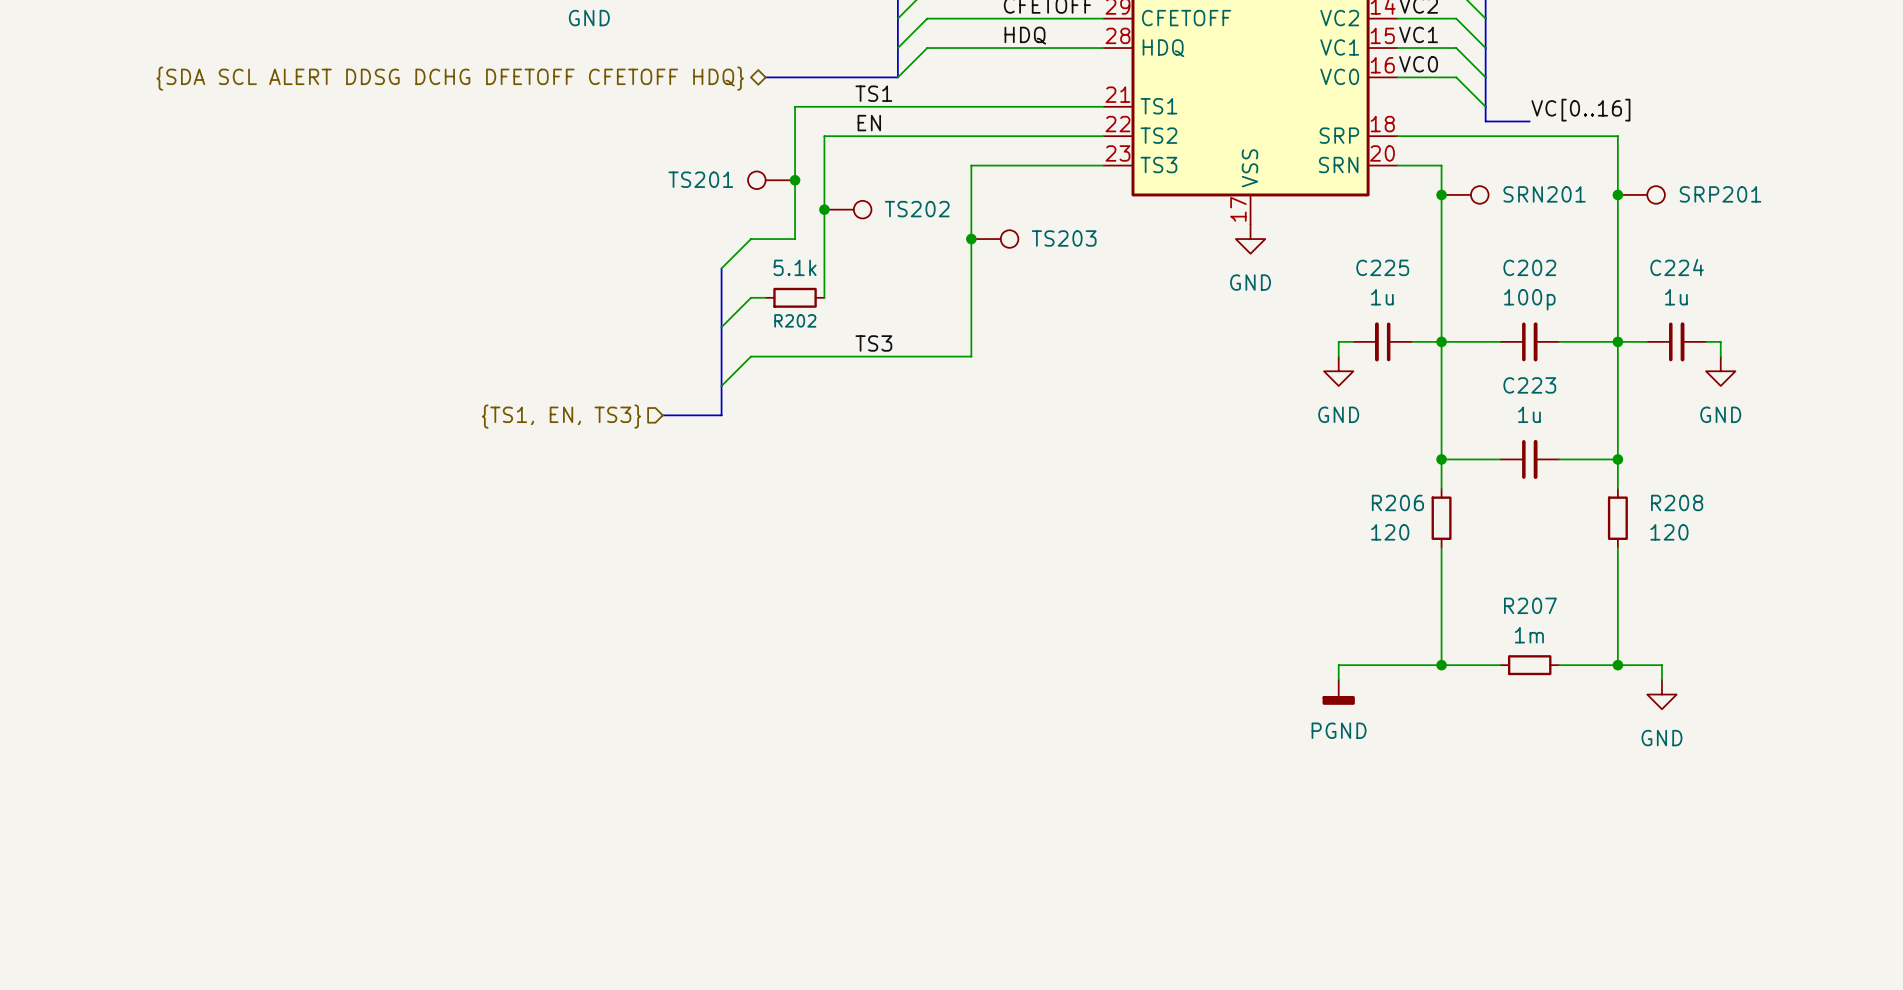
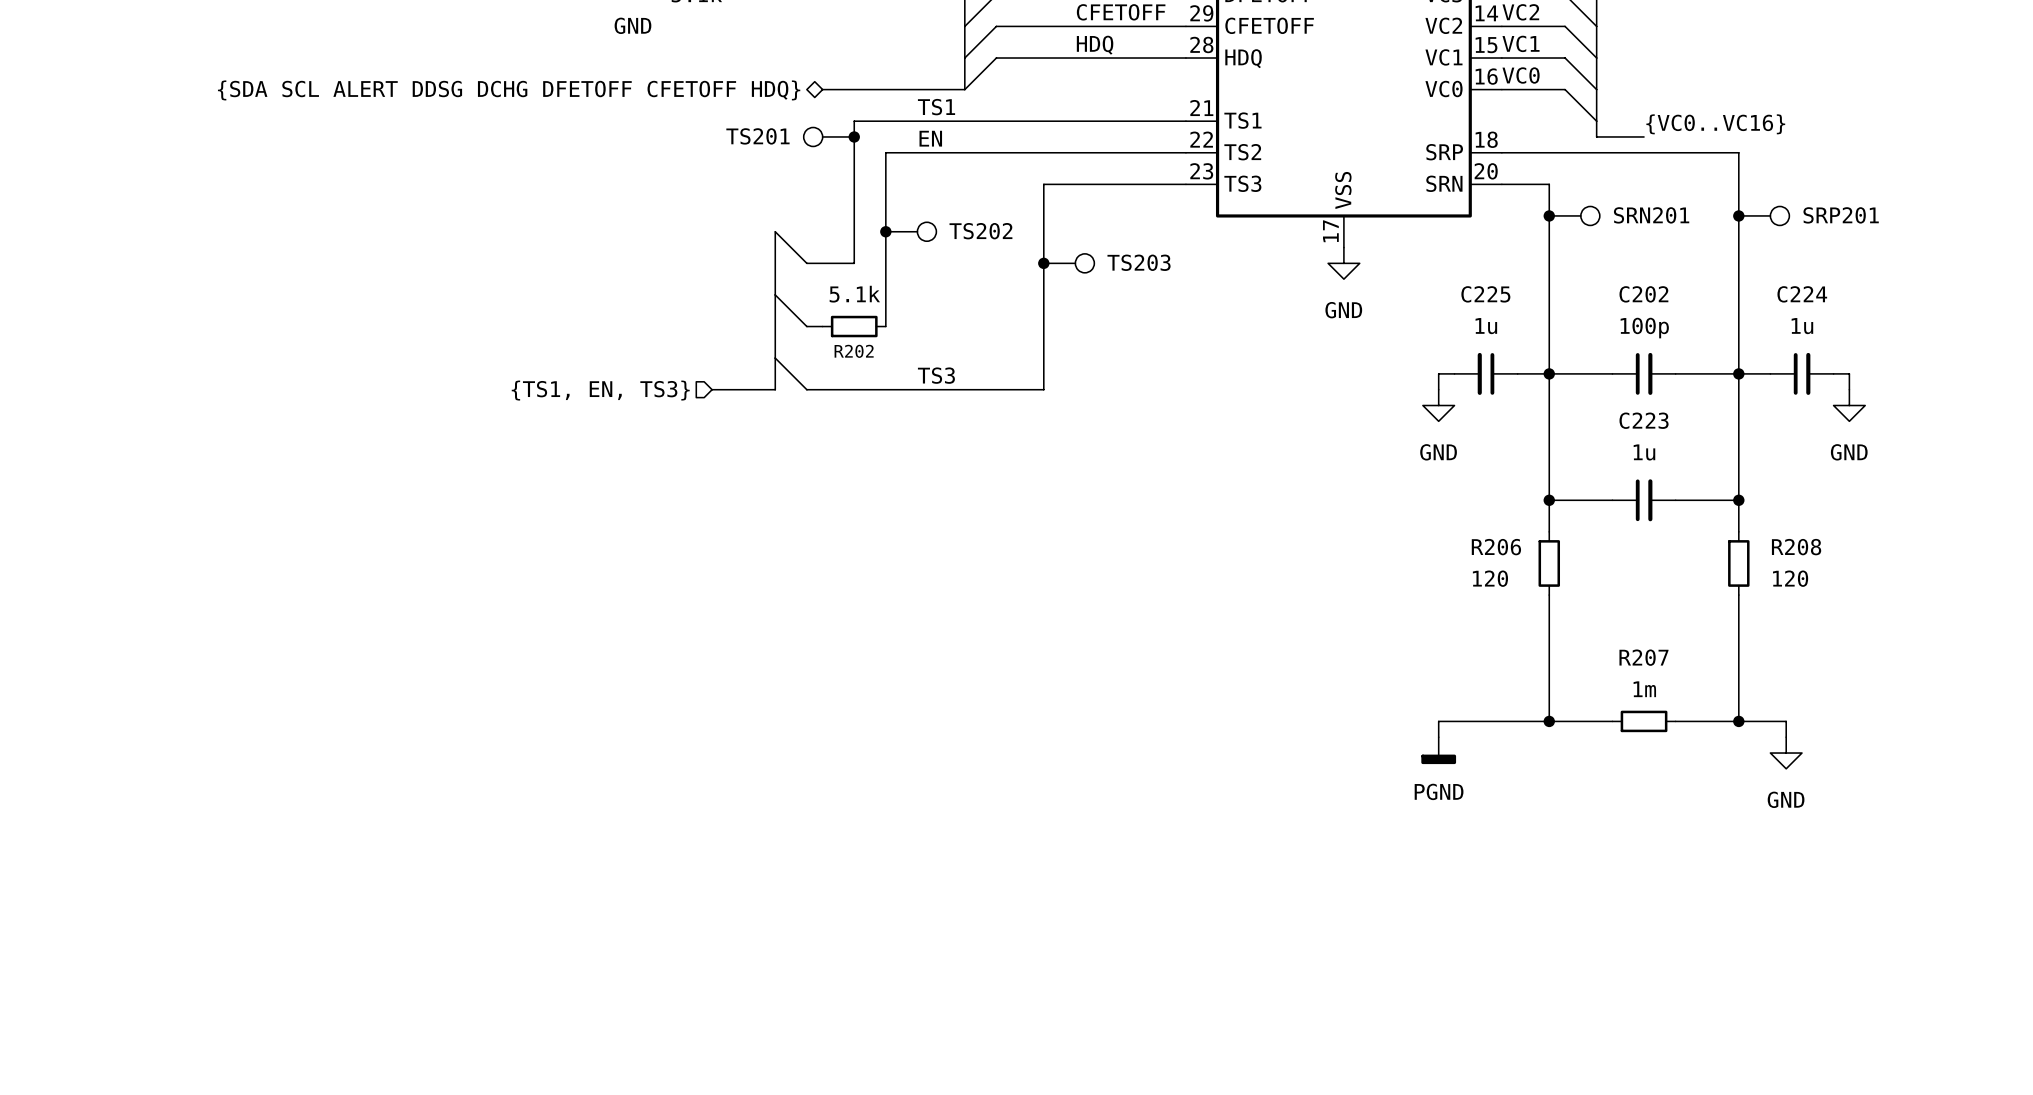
label: VC[0..16] (1580, 110) -> {VC0..VC16} (1715, 124)
TS201 position: (771, 180) -> (828, 136)
junction position: (795, 180) -> (854, 136)
bus: none -> (775, 231) (775, 294)
wire: (750, 239) (721, 268) -> (806, 263) (775, 231)
wire: none -> (775, 294) (806, 326)
wire: (750, 297) (721, 327) -> (806, 389) (775, 358)
bus: (721, 356) (721, 415) (662, 415) -> (775, 389) (712, 389)
wire: (750, 356) (721, 385) -> none
hierarchical label position: {TS1, EN, TS3} (561, 416) -> {TS1, EN, TS3} (600, 390)

